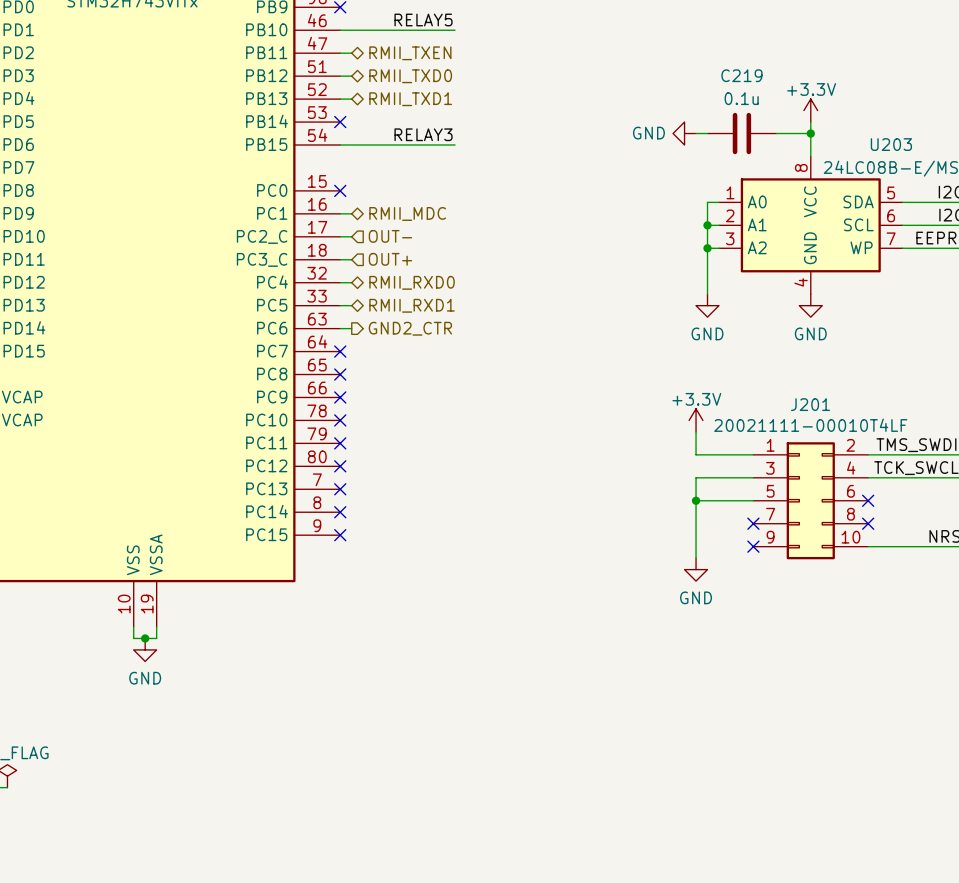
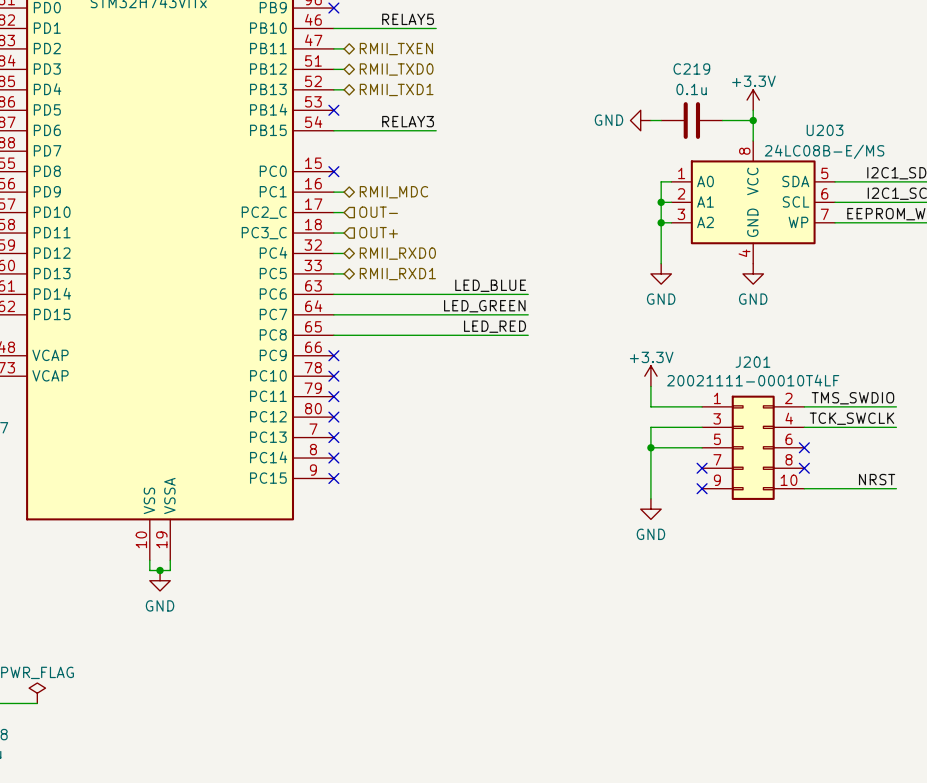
label: none -> LED_BLUE (490, 285)
wire: none -> (344, 294) (528, 294)
hierarchical label: GND2_CTR (410, 328) -> none
label: none -> LED_GREEN (484, 306)
wire: none -> (333, 314) (528, 314)
no-connect mark: (340, 351) -> none
label: none -> LED_RED (495, 326)
wire: none -> (333, 335) (528, 335)
no-connect mark: (340, 374) -> none

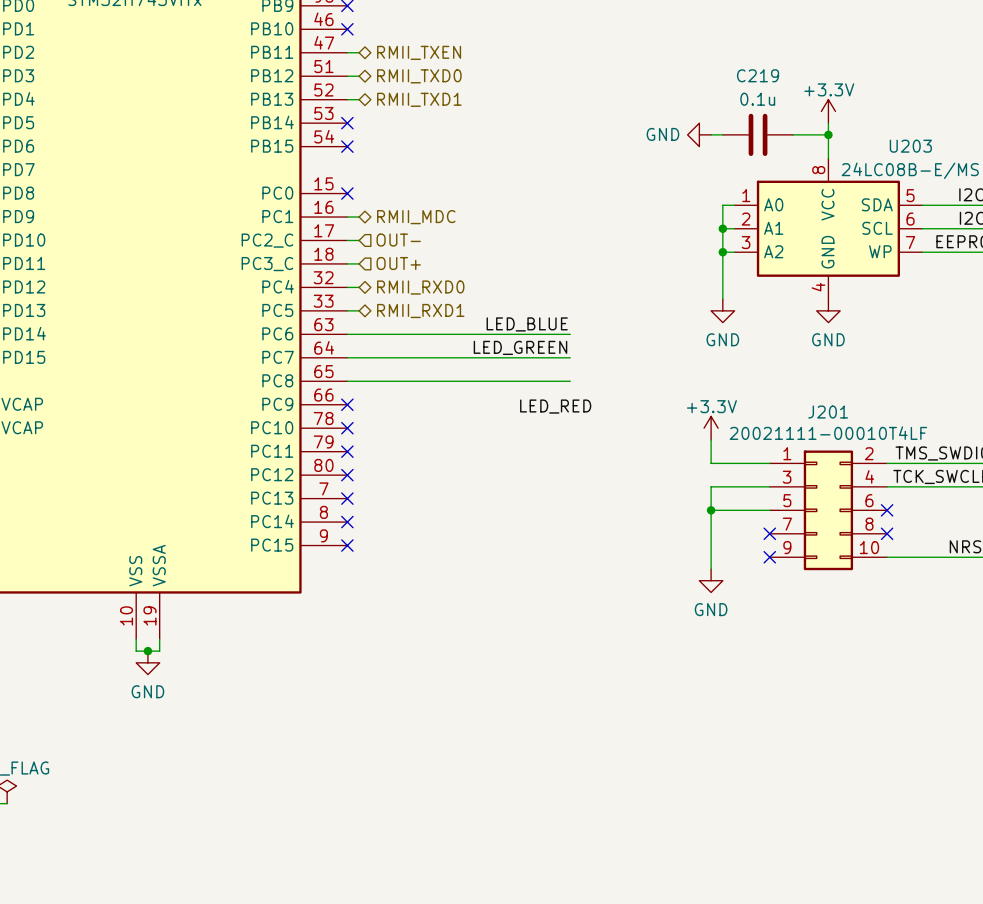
label: RELAY5 (408, 19) -> none
wire: (333, 28) (436, 28) -> none
no-connect mark: none -> (347, 29)
label: RELAY3 (408, 121) -> none
wire: (333, 130) (436, 130) -> none
no-connect mark: none -> (347, 146)
label position: LED_RED (495, 326) -> LED_RED (555, 406)

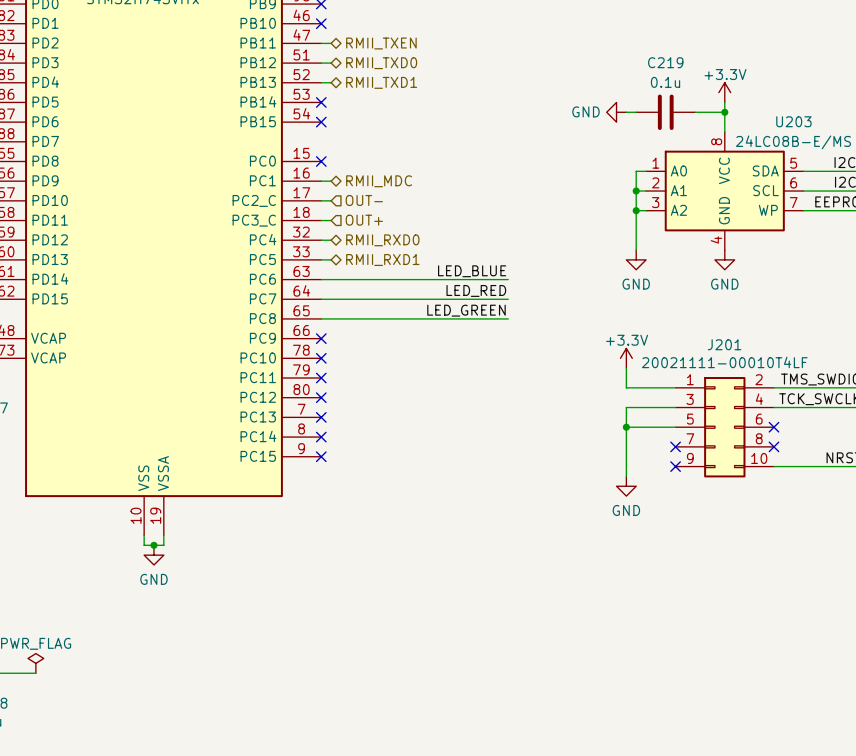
label: LED_GREEN (520, 347) -> LED_RED (476, 290)
label: none -> LED_GREEN (466, 310)
label: LED_RED (555, 406) -> none

